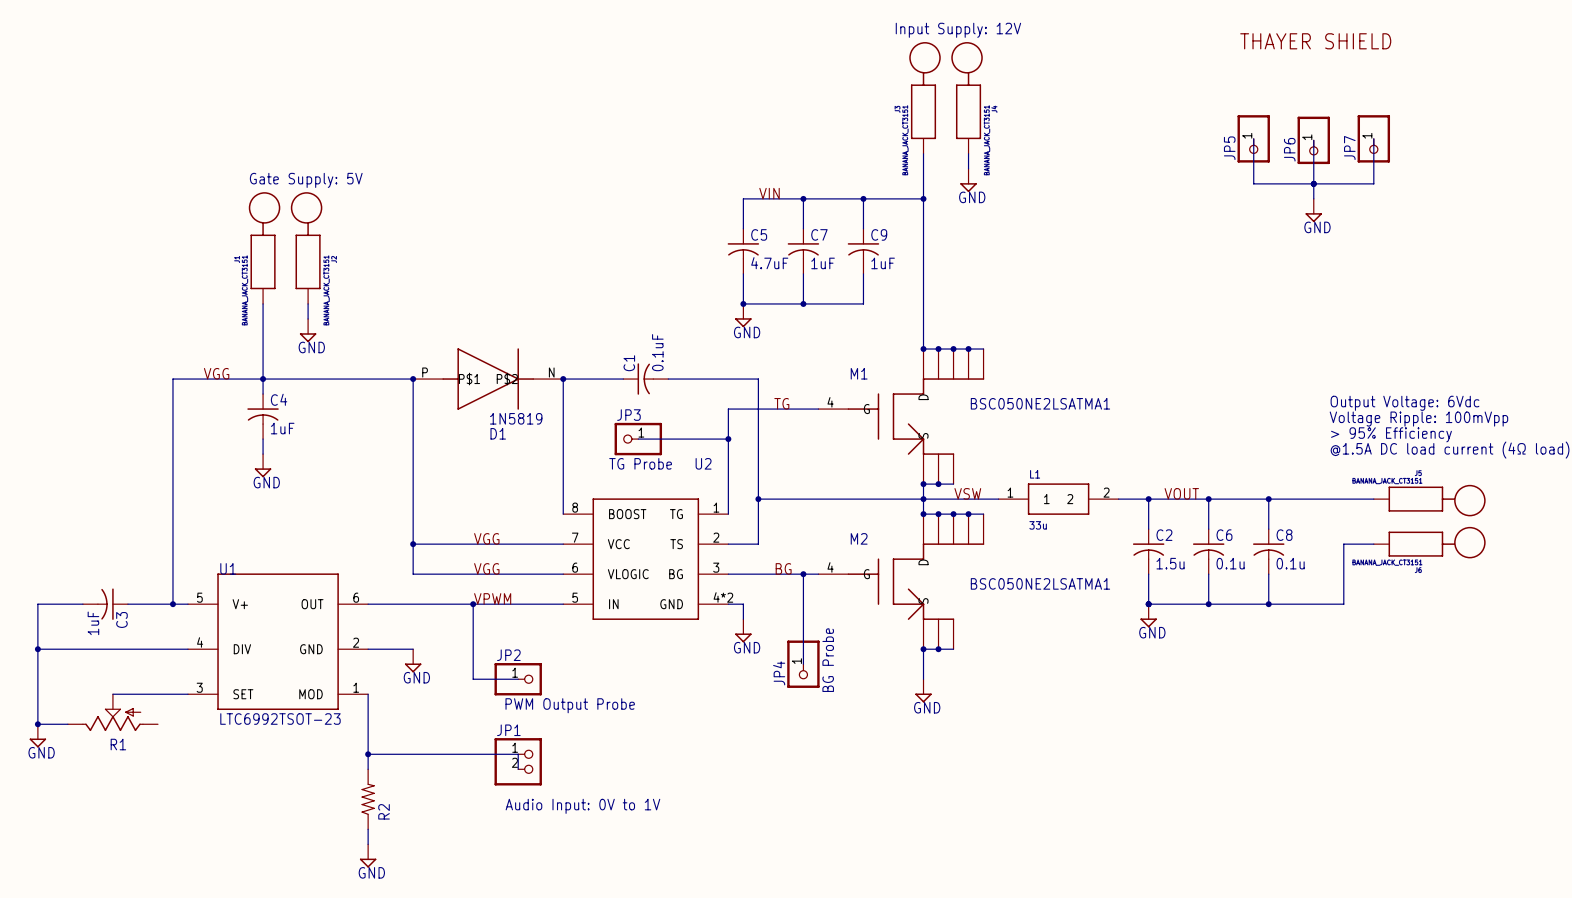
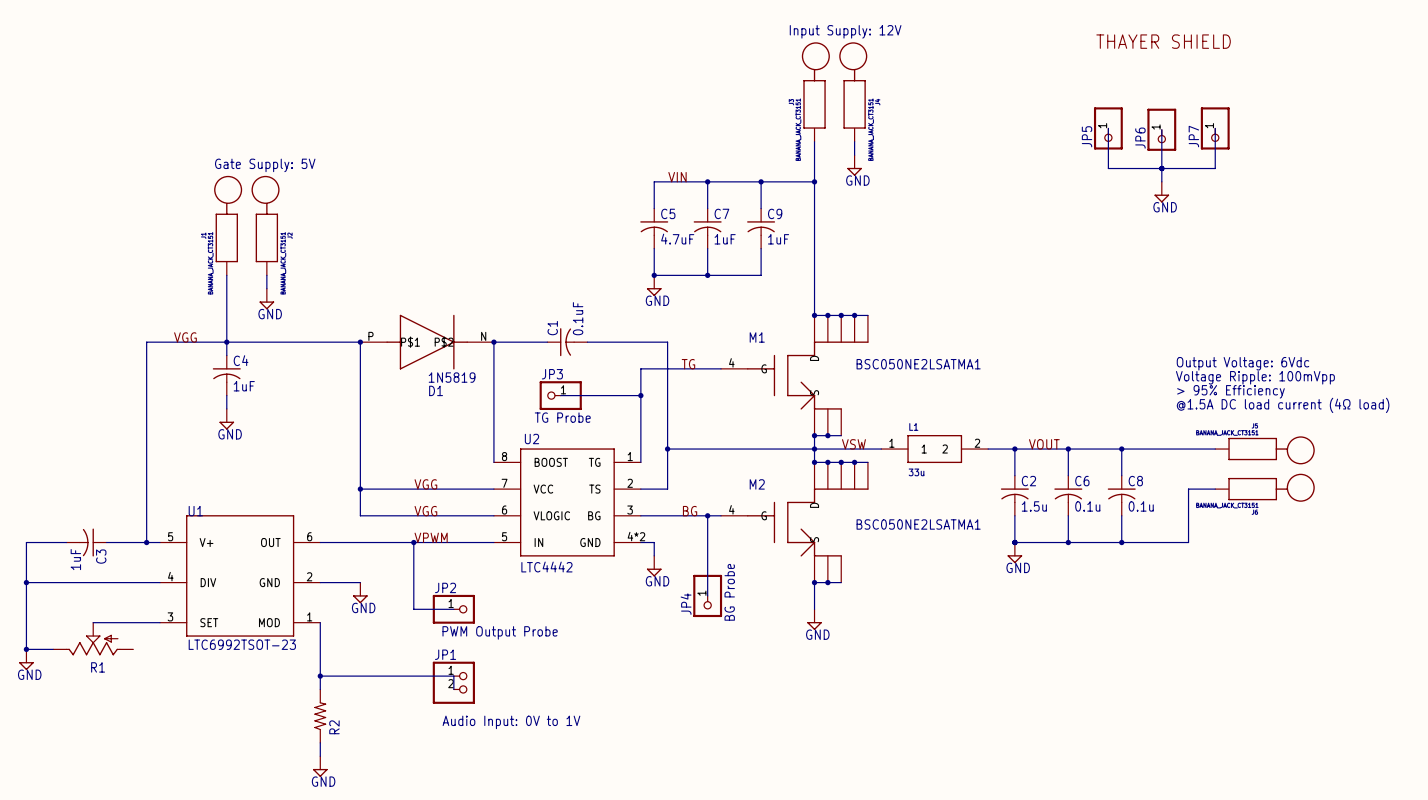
U2 name position: U2 (703, 463) -> U2 (531, 439)
U2 value: none -> LTC4442 (546, 567)

